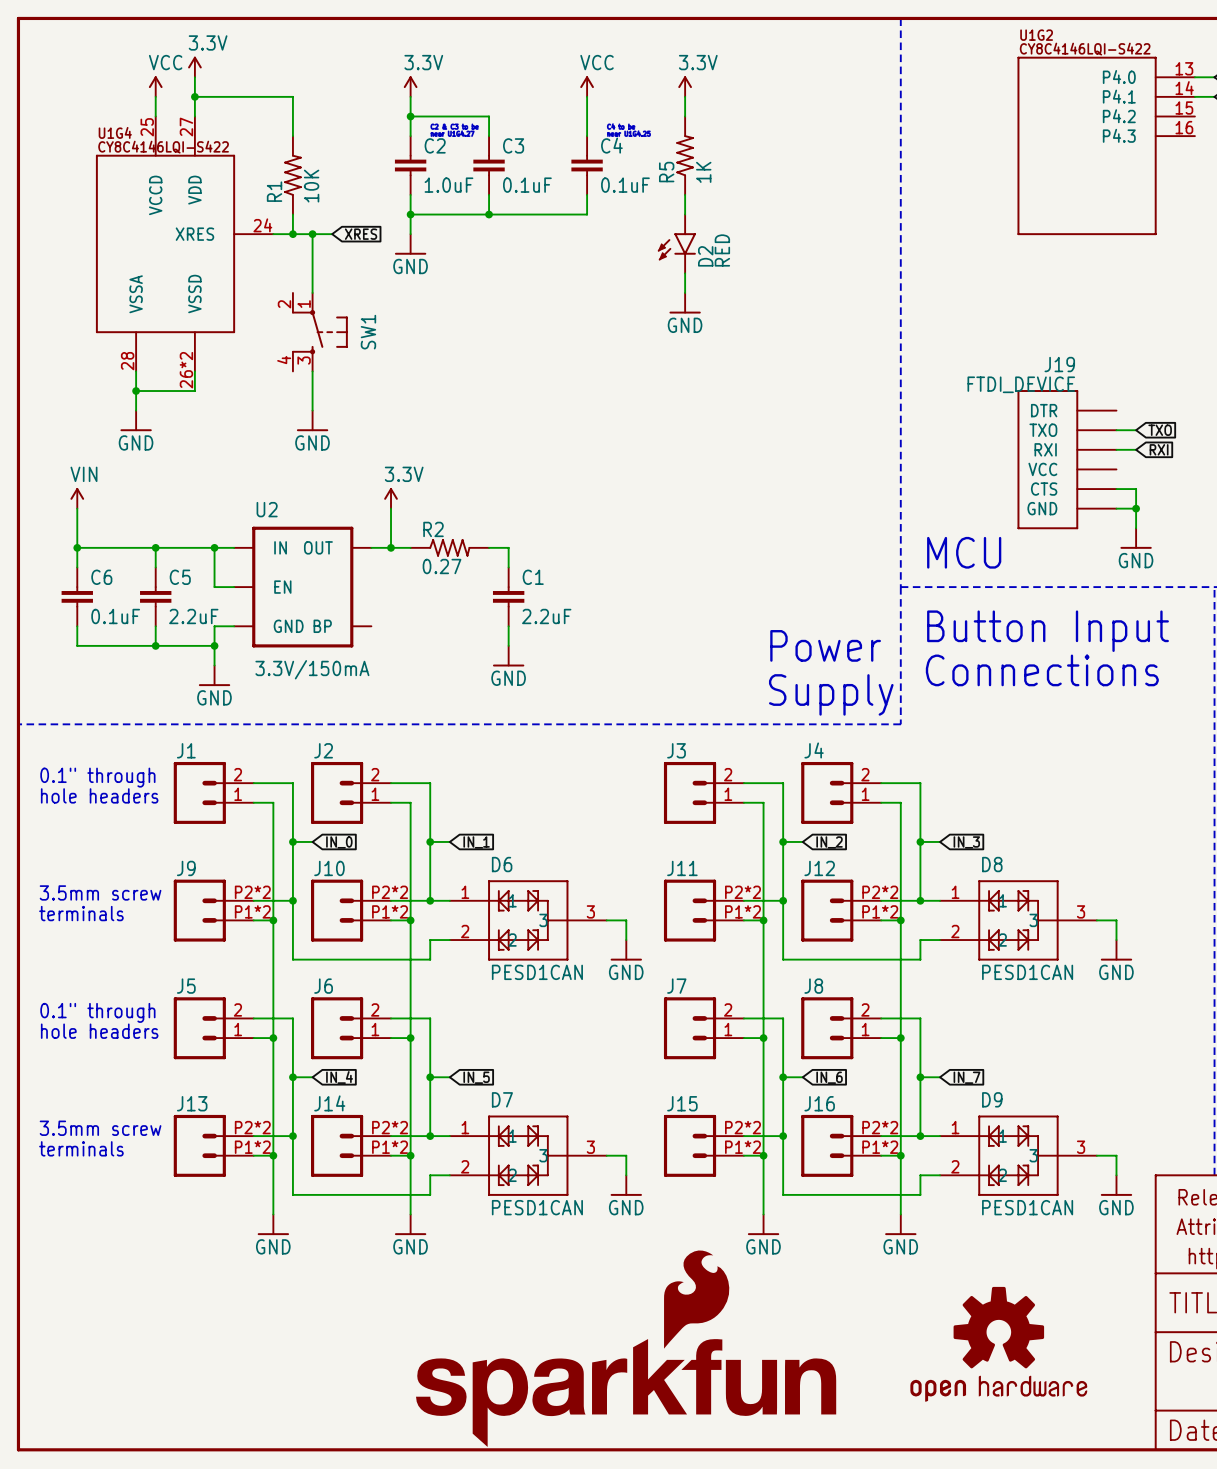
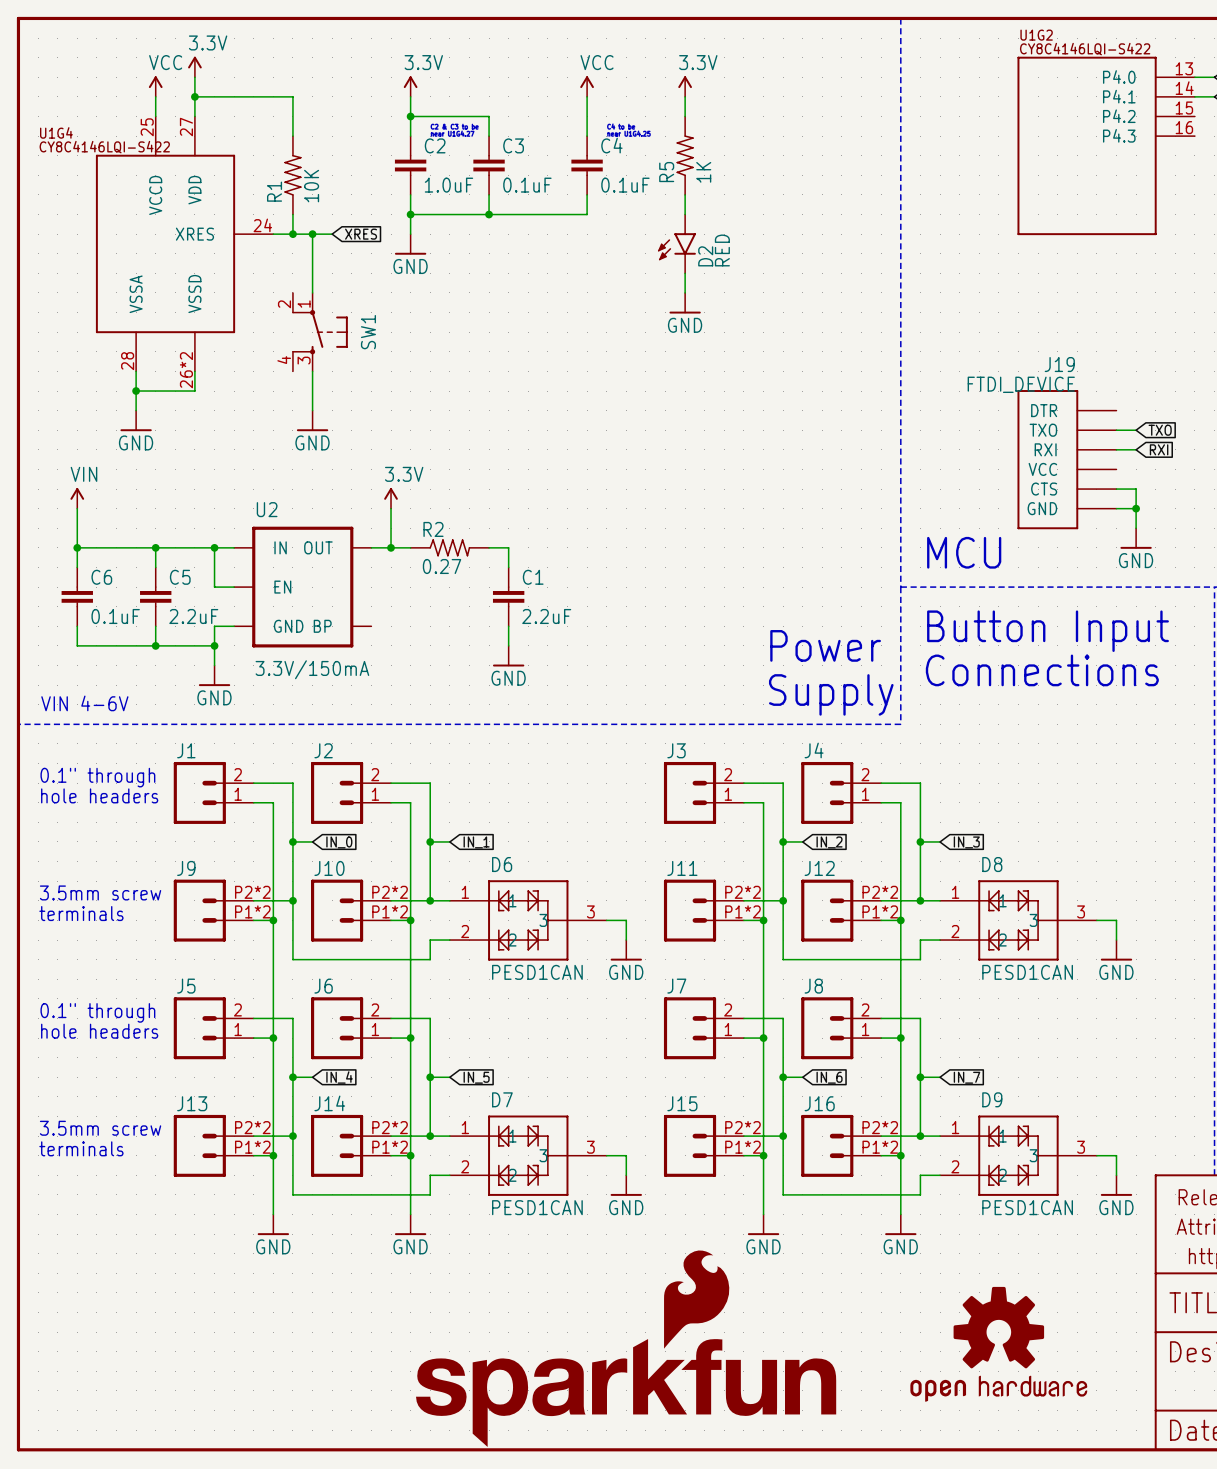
U1G4 name position: U1G4 (115, 132) -> U1G4 (56, 132)
U1G4 value position: CY8C4146LQI-S422 (163, 147) -> CY8C4146LQI-S422 (104, 147)
text: none -> VIN 4-6V (84, 703)

